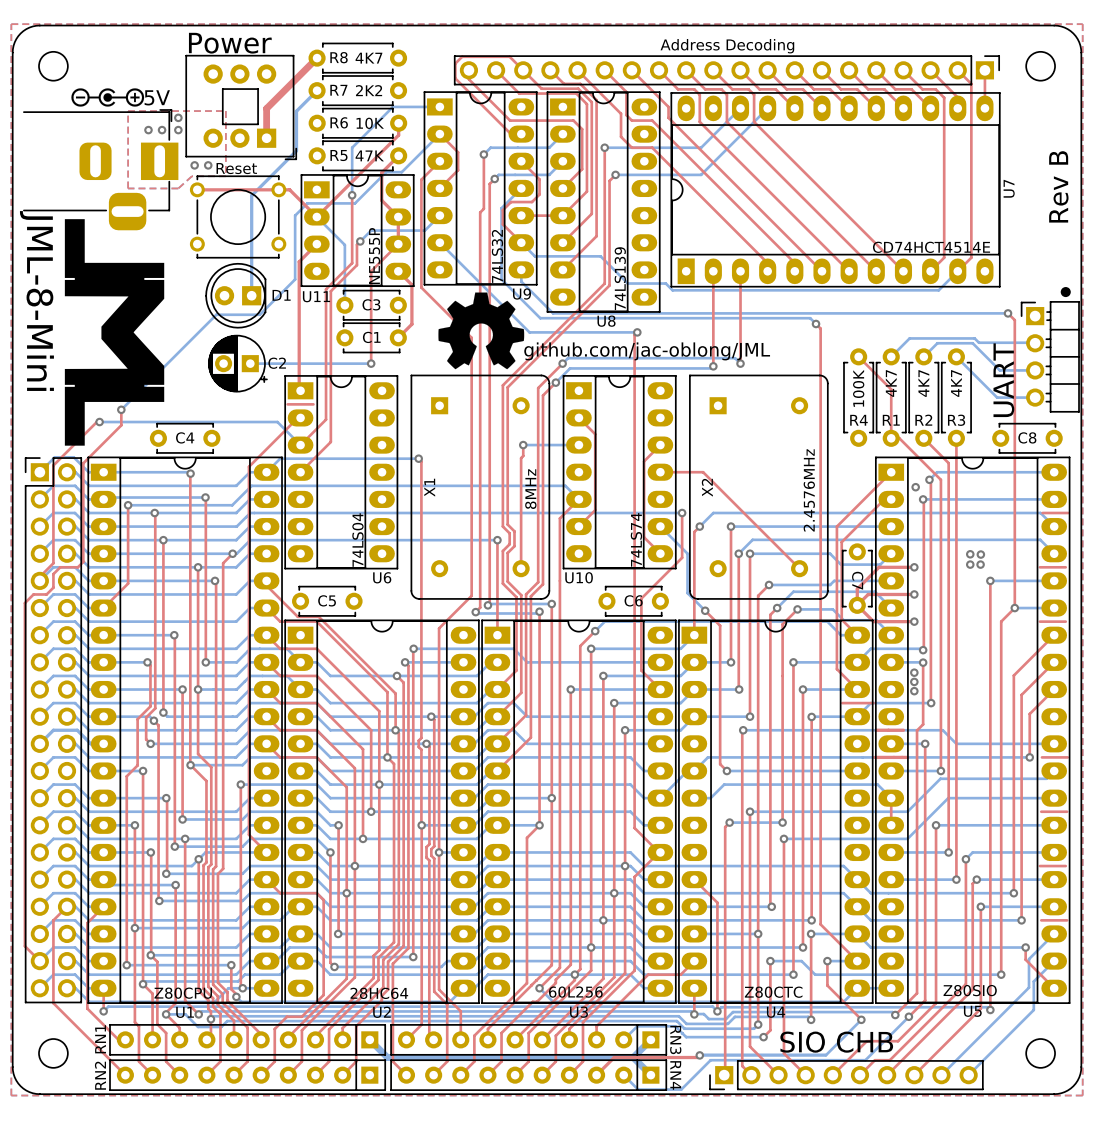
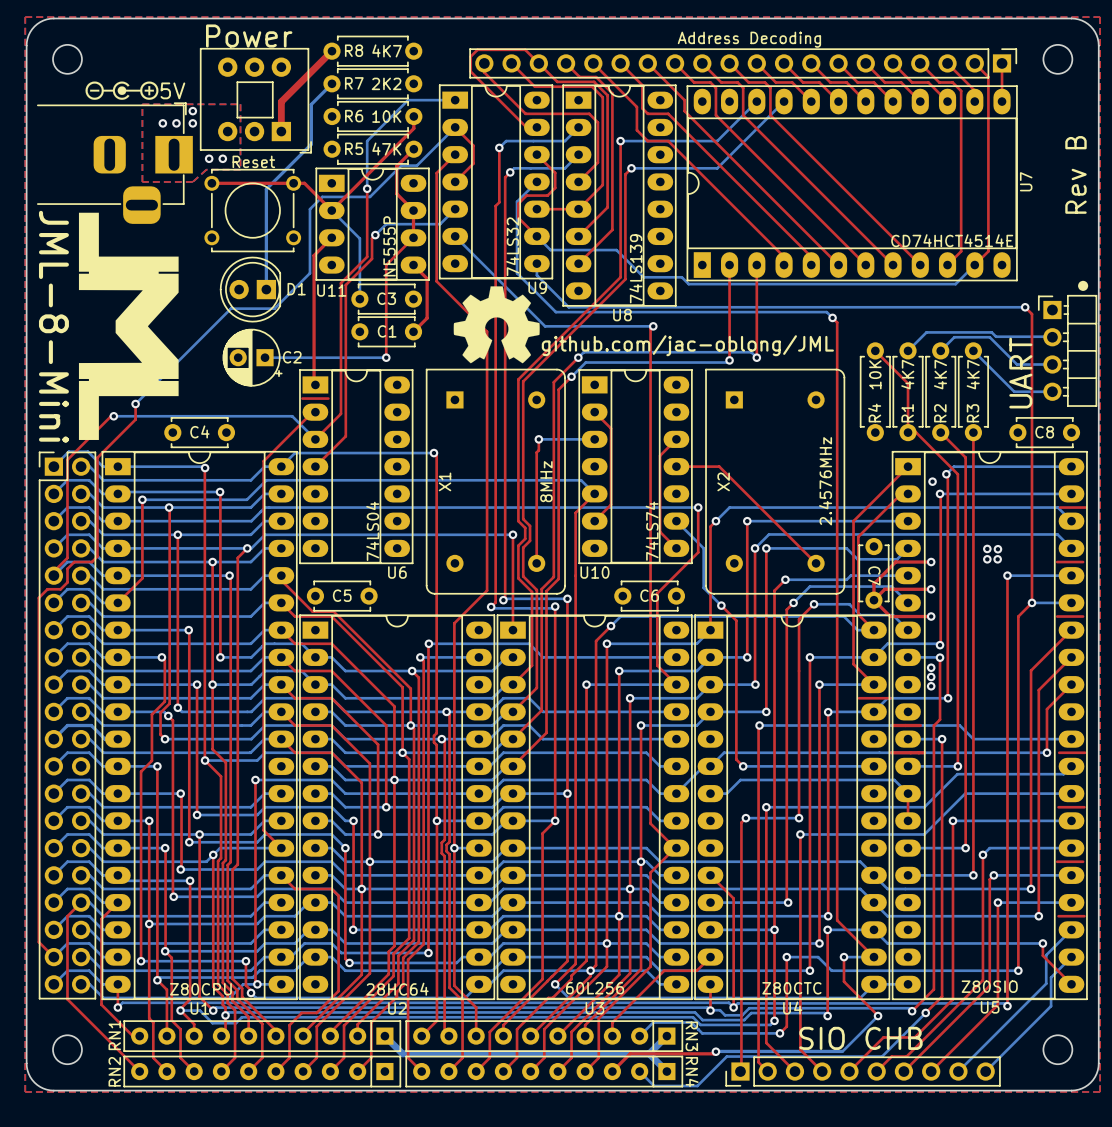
text: 100K (858, 388) -> 10K (875, 374)
R4 name rotation: 0° (858, 420) -> 90° counterclockwise (874, 413)
R1 name rotation: 0° (891, 420) -> 90° counterclockwise (907, 413)
R2 name rotation: 0° (923, 420) -> 90° counterclockwise (940, 413)
R3 name rotation: 0° (956, 420) -> 90° counterclockwise (973, 413)

